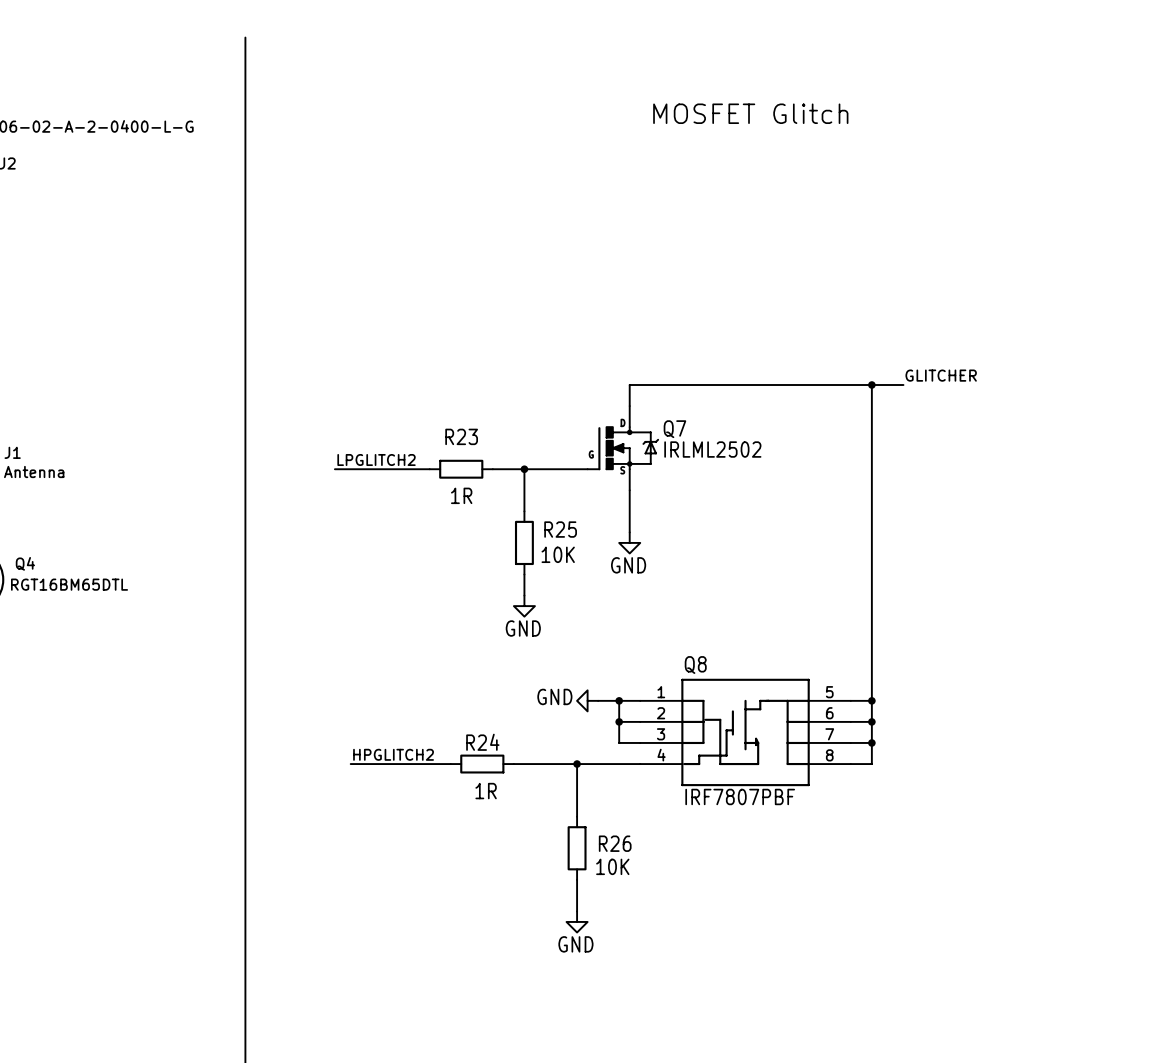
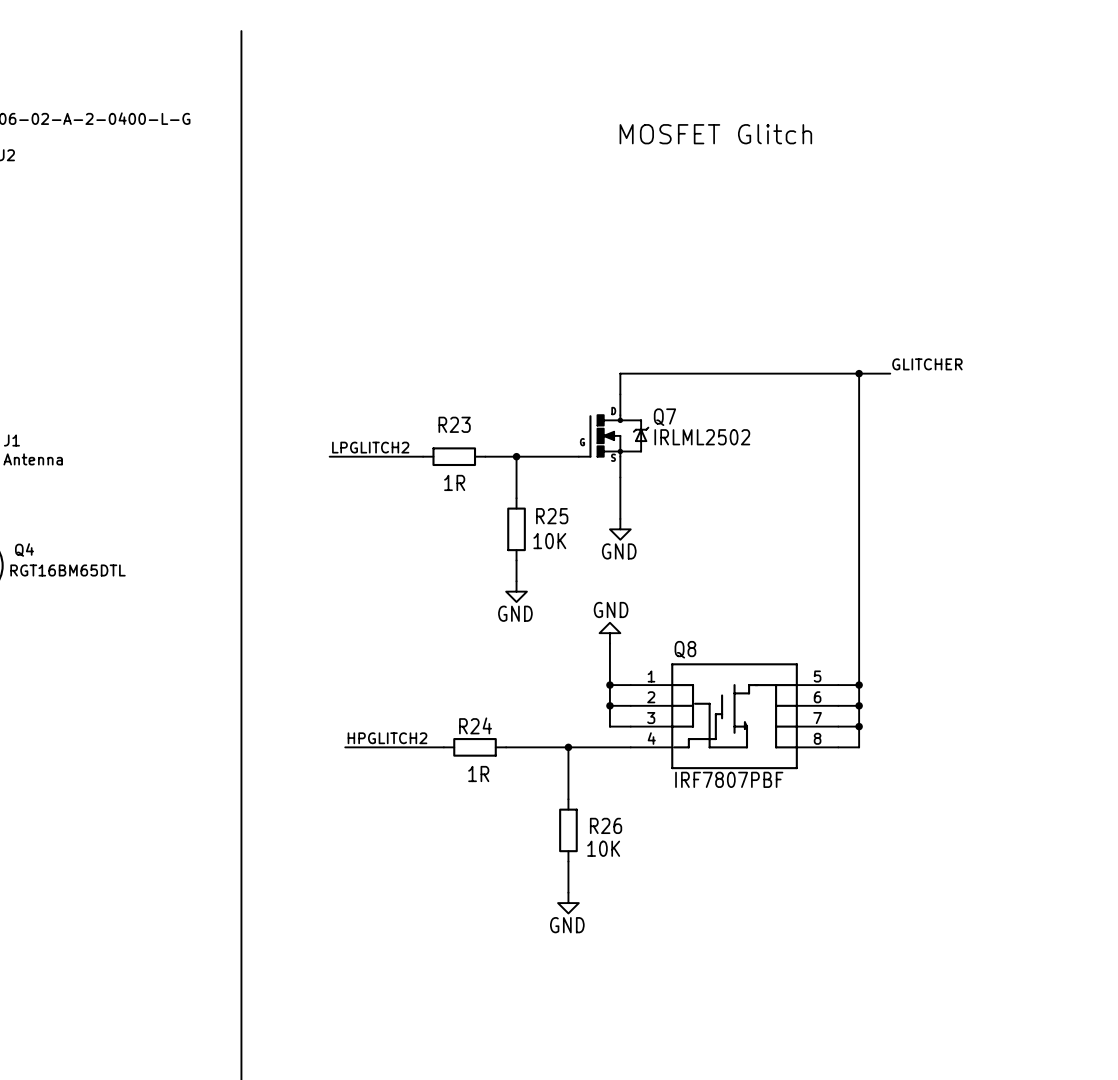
text position: MOSFET Glitch (750, 113) -> MOSFET Glitch (715, 134)
power symbol rotation: 0° (587, 700) -> 90° clockwise (609, 633)
power symbol position: GND (587, 700) -> GND (609, 633)
wire: (598, 700) (619, 700) -> (609, 643) (609, 685)

